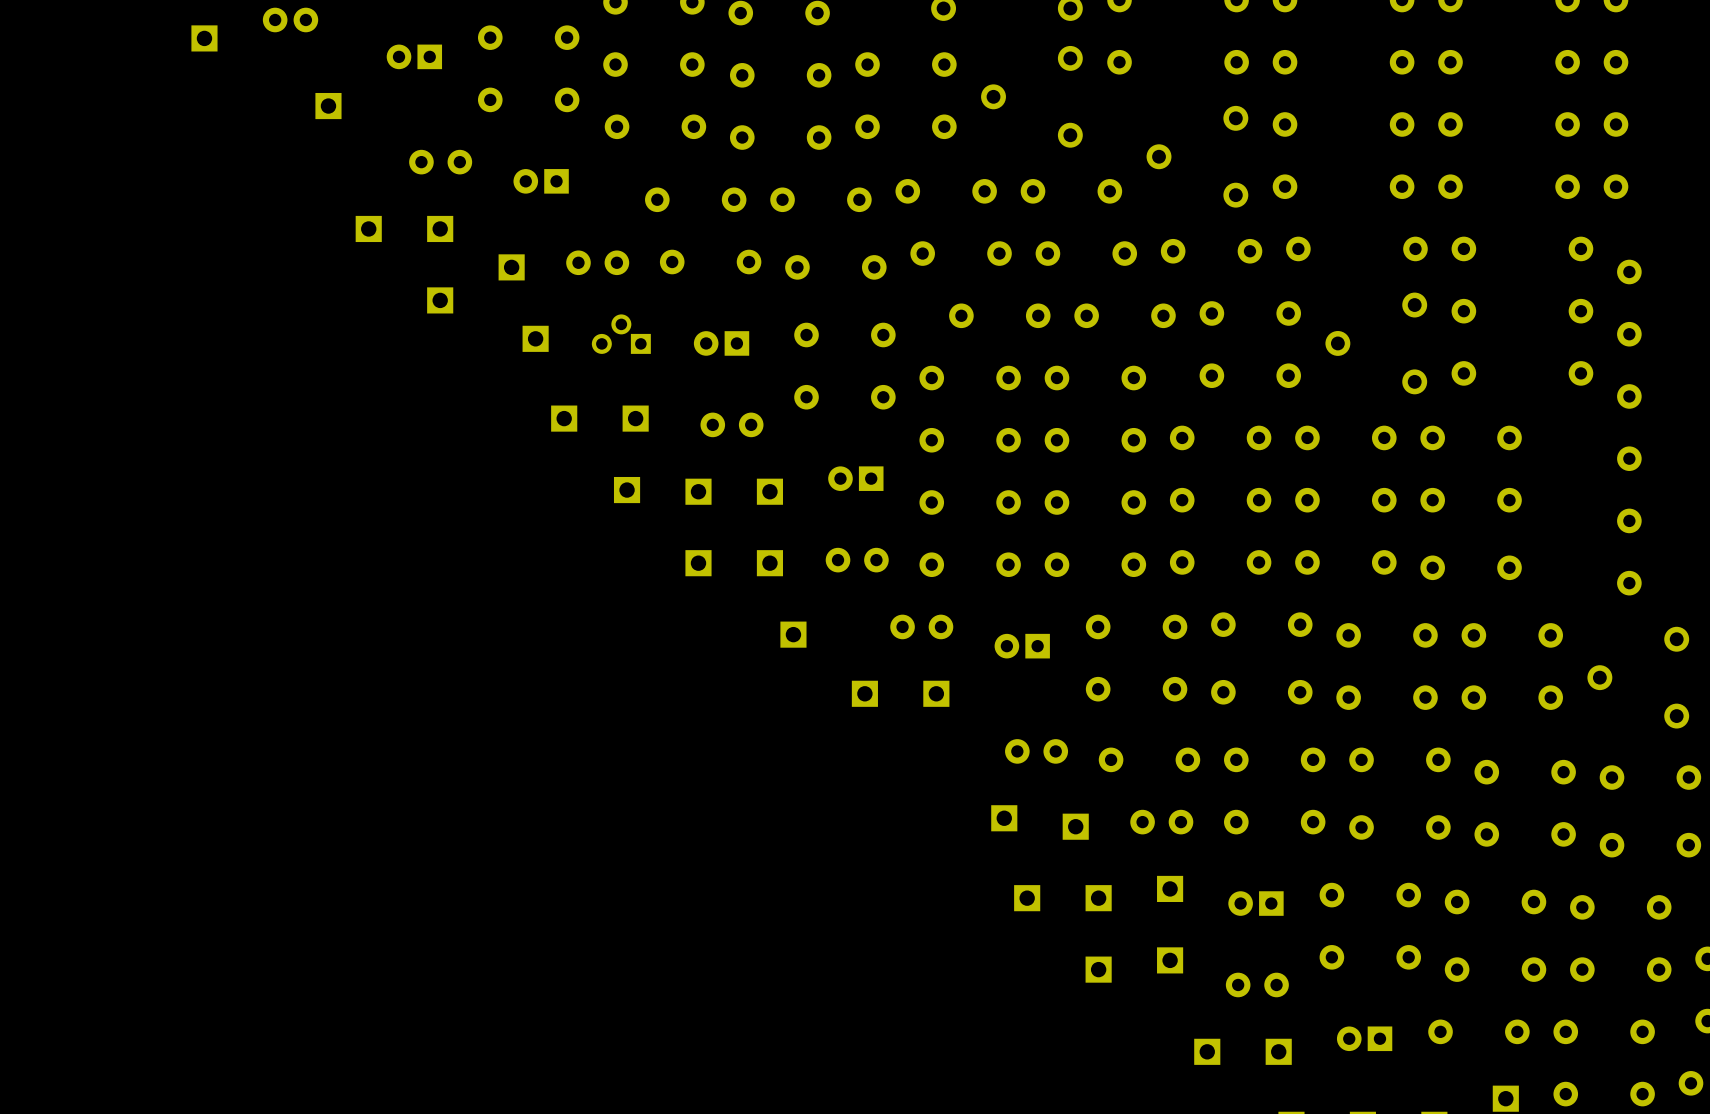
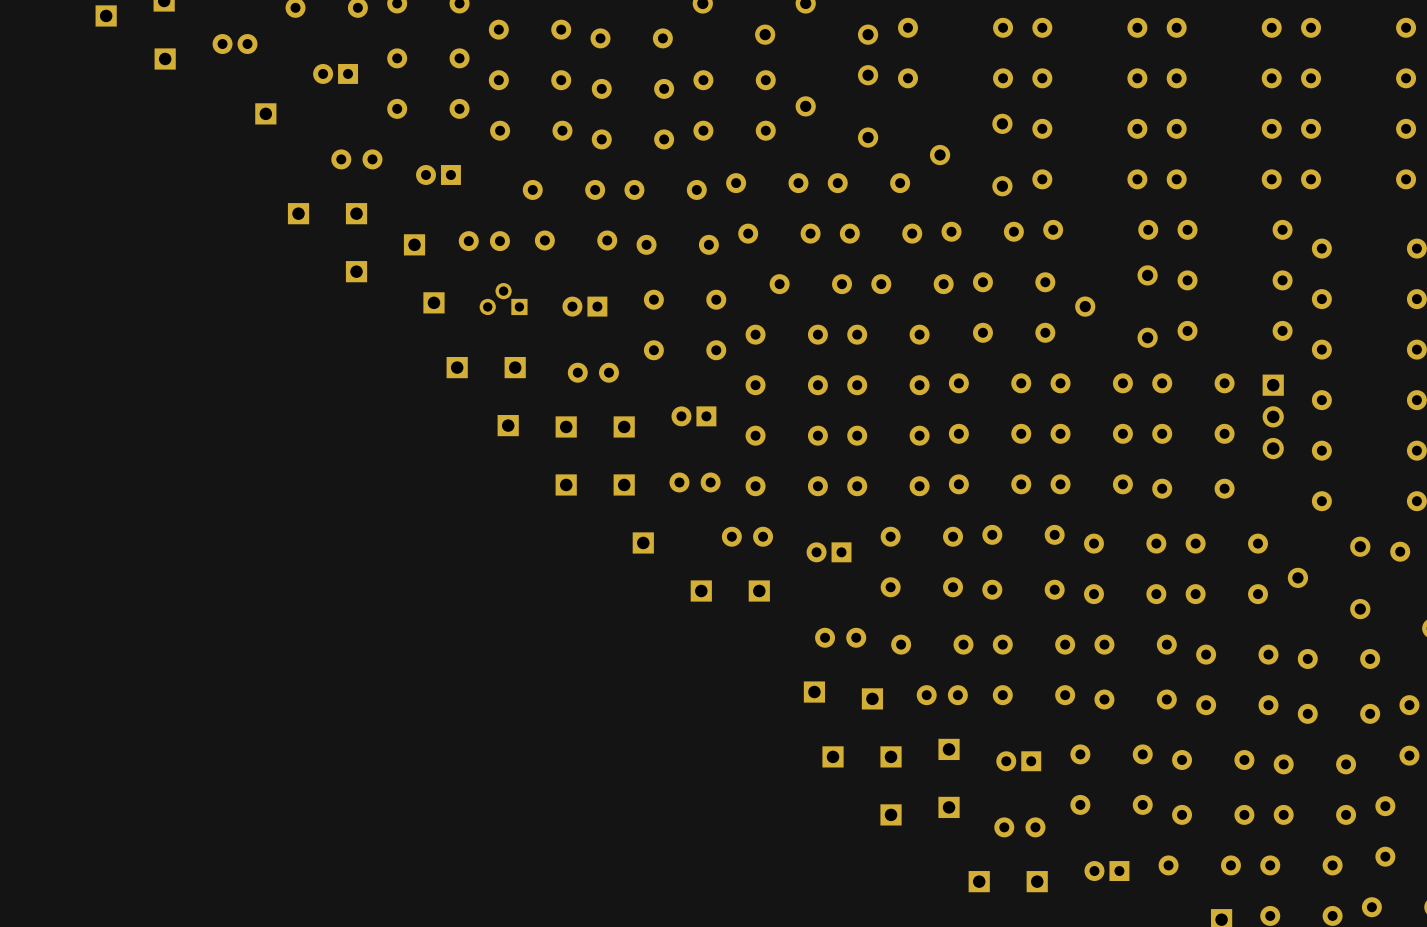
part: none -> (1273, 416)

